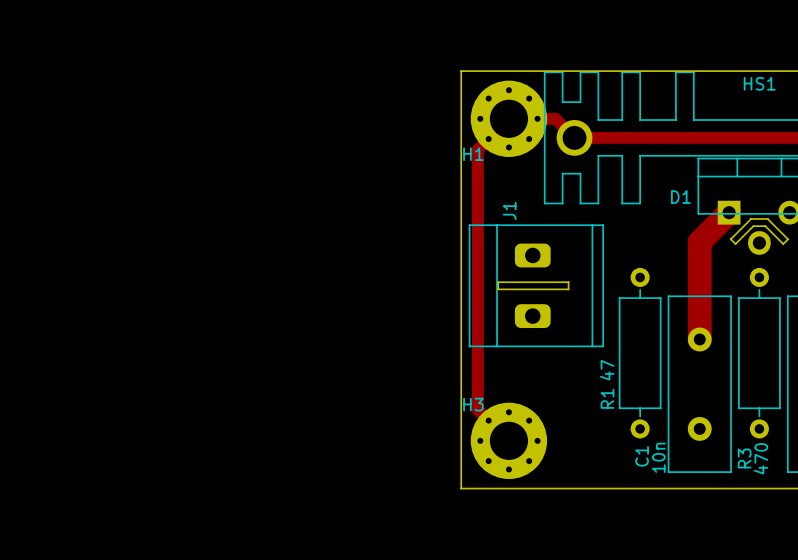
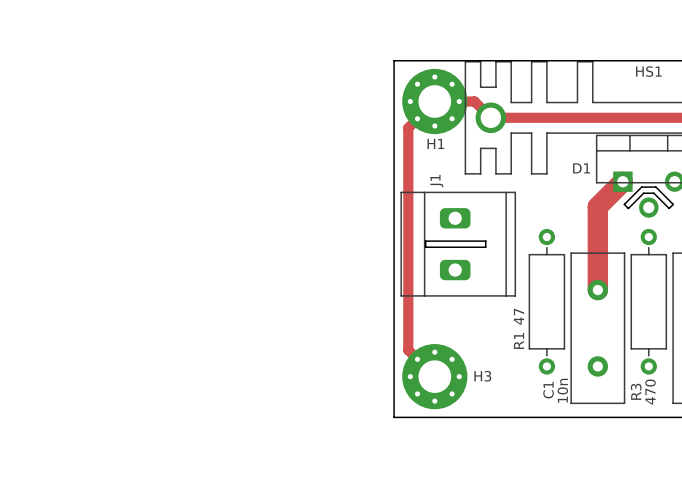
H1 name position: H1 (473, 154) -> H1 (435, 143)
H3 name position: H3 (473, 404) -> H3 (482, 376)

